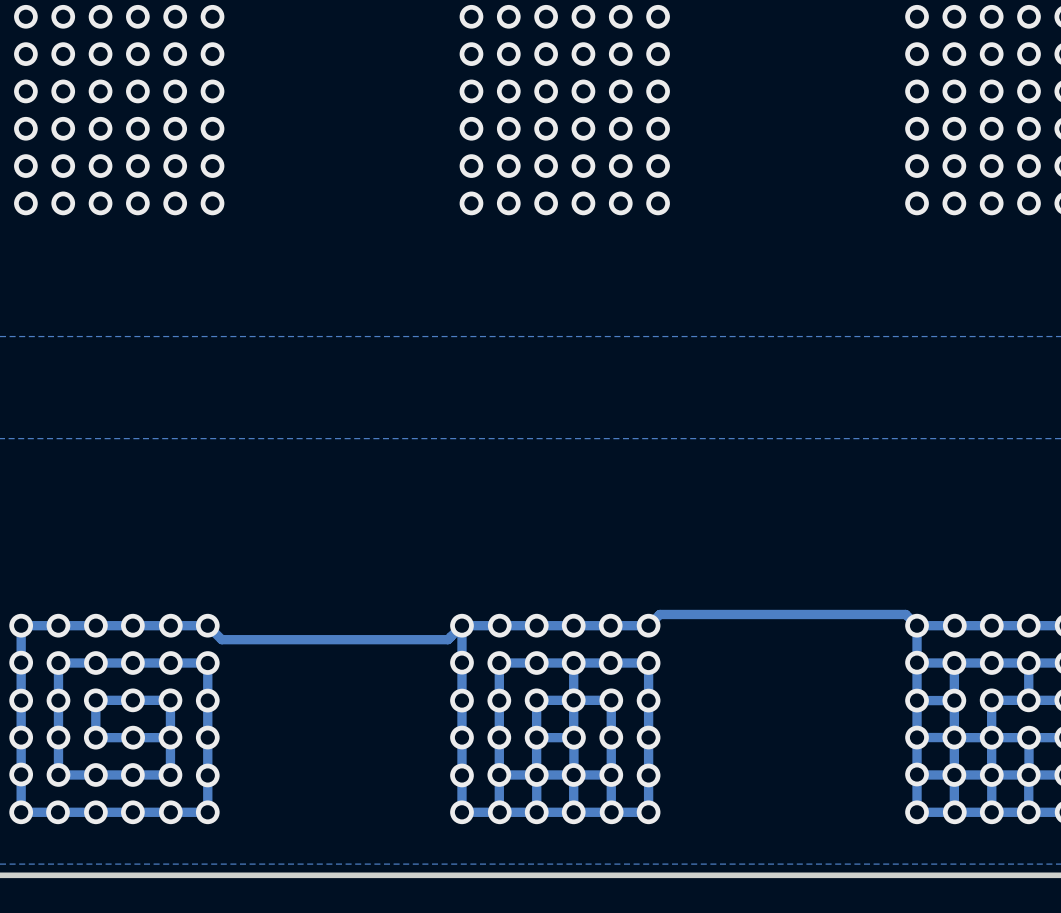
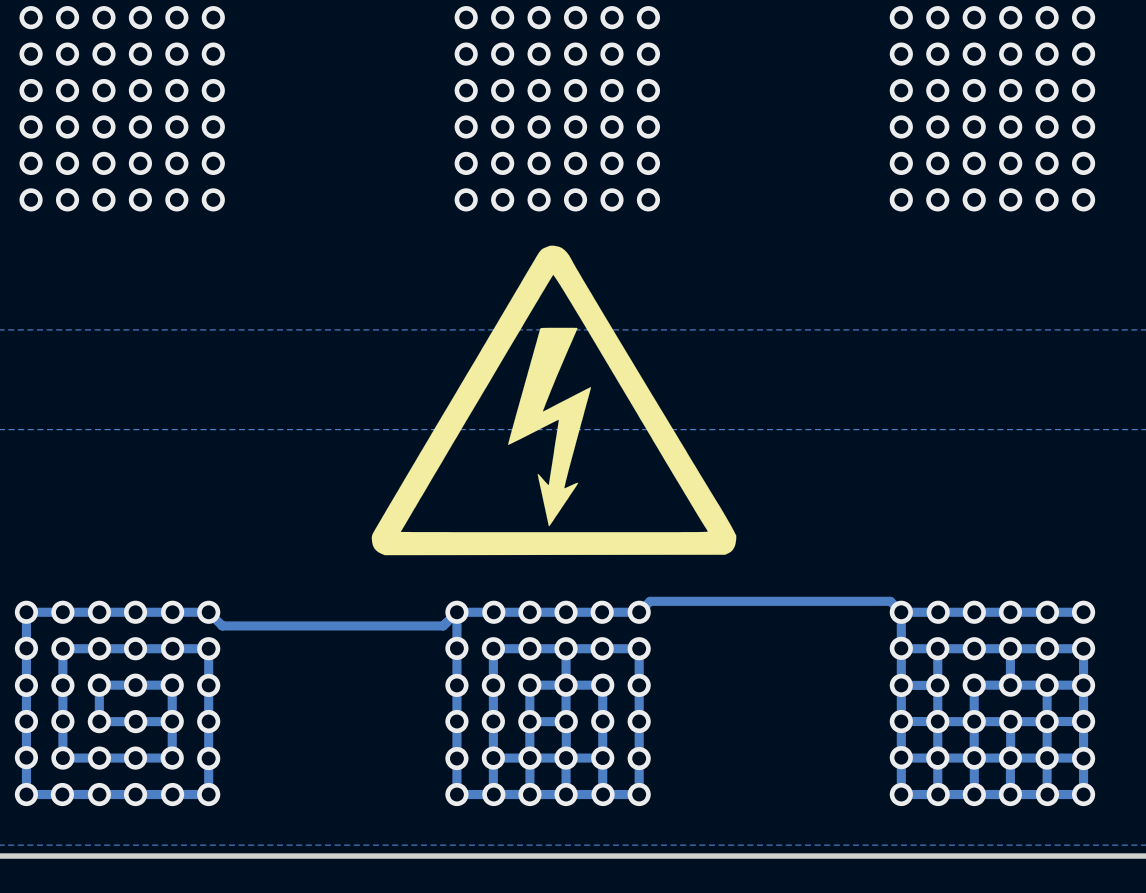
drawing: none -> [371, 245, 737, 556]

